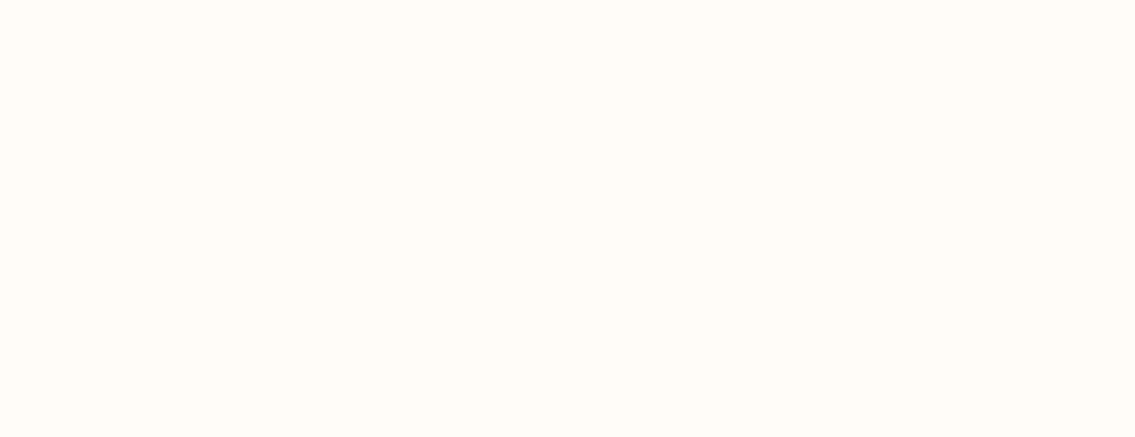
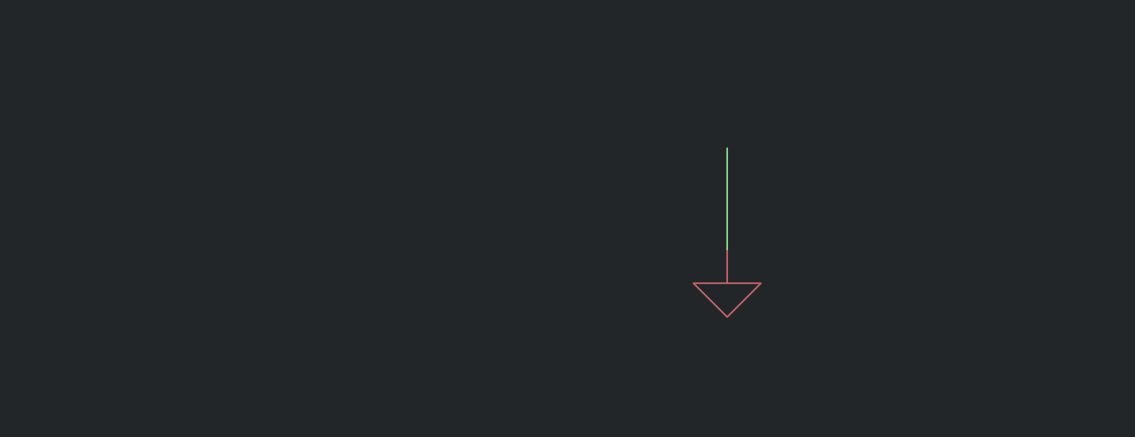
wire: none -> (727, 148) (727, 249)
power symbol: none -> (727, 283)

